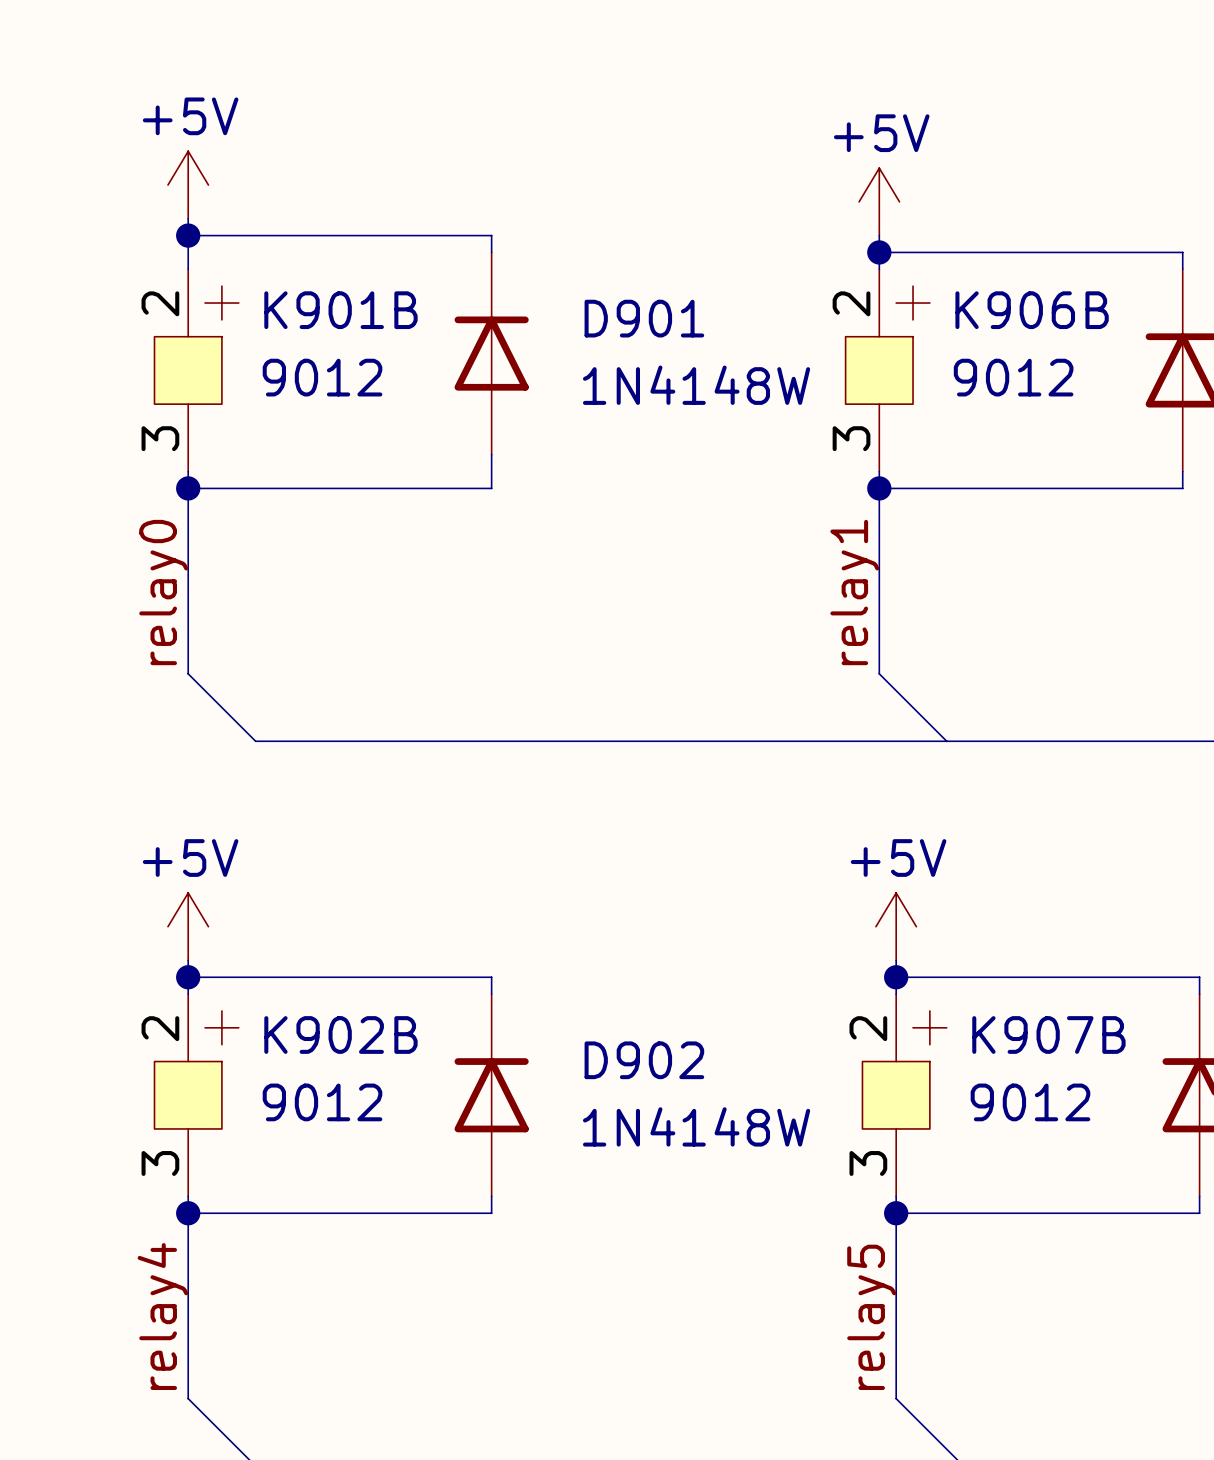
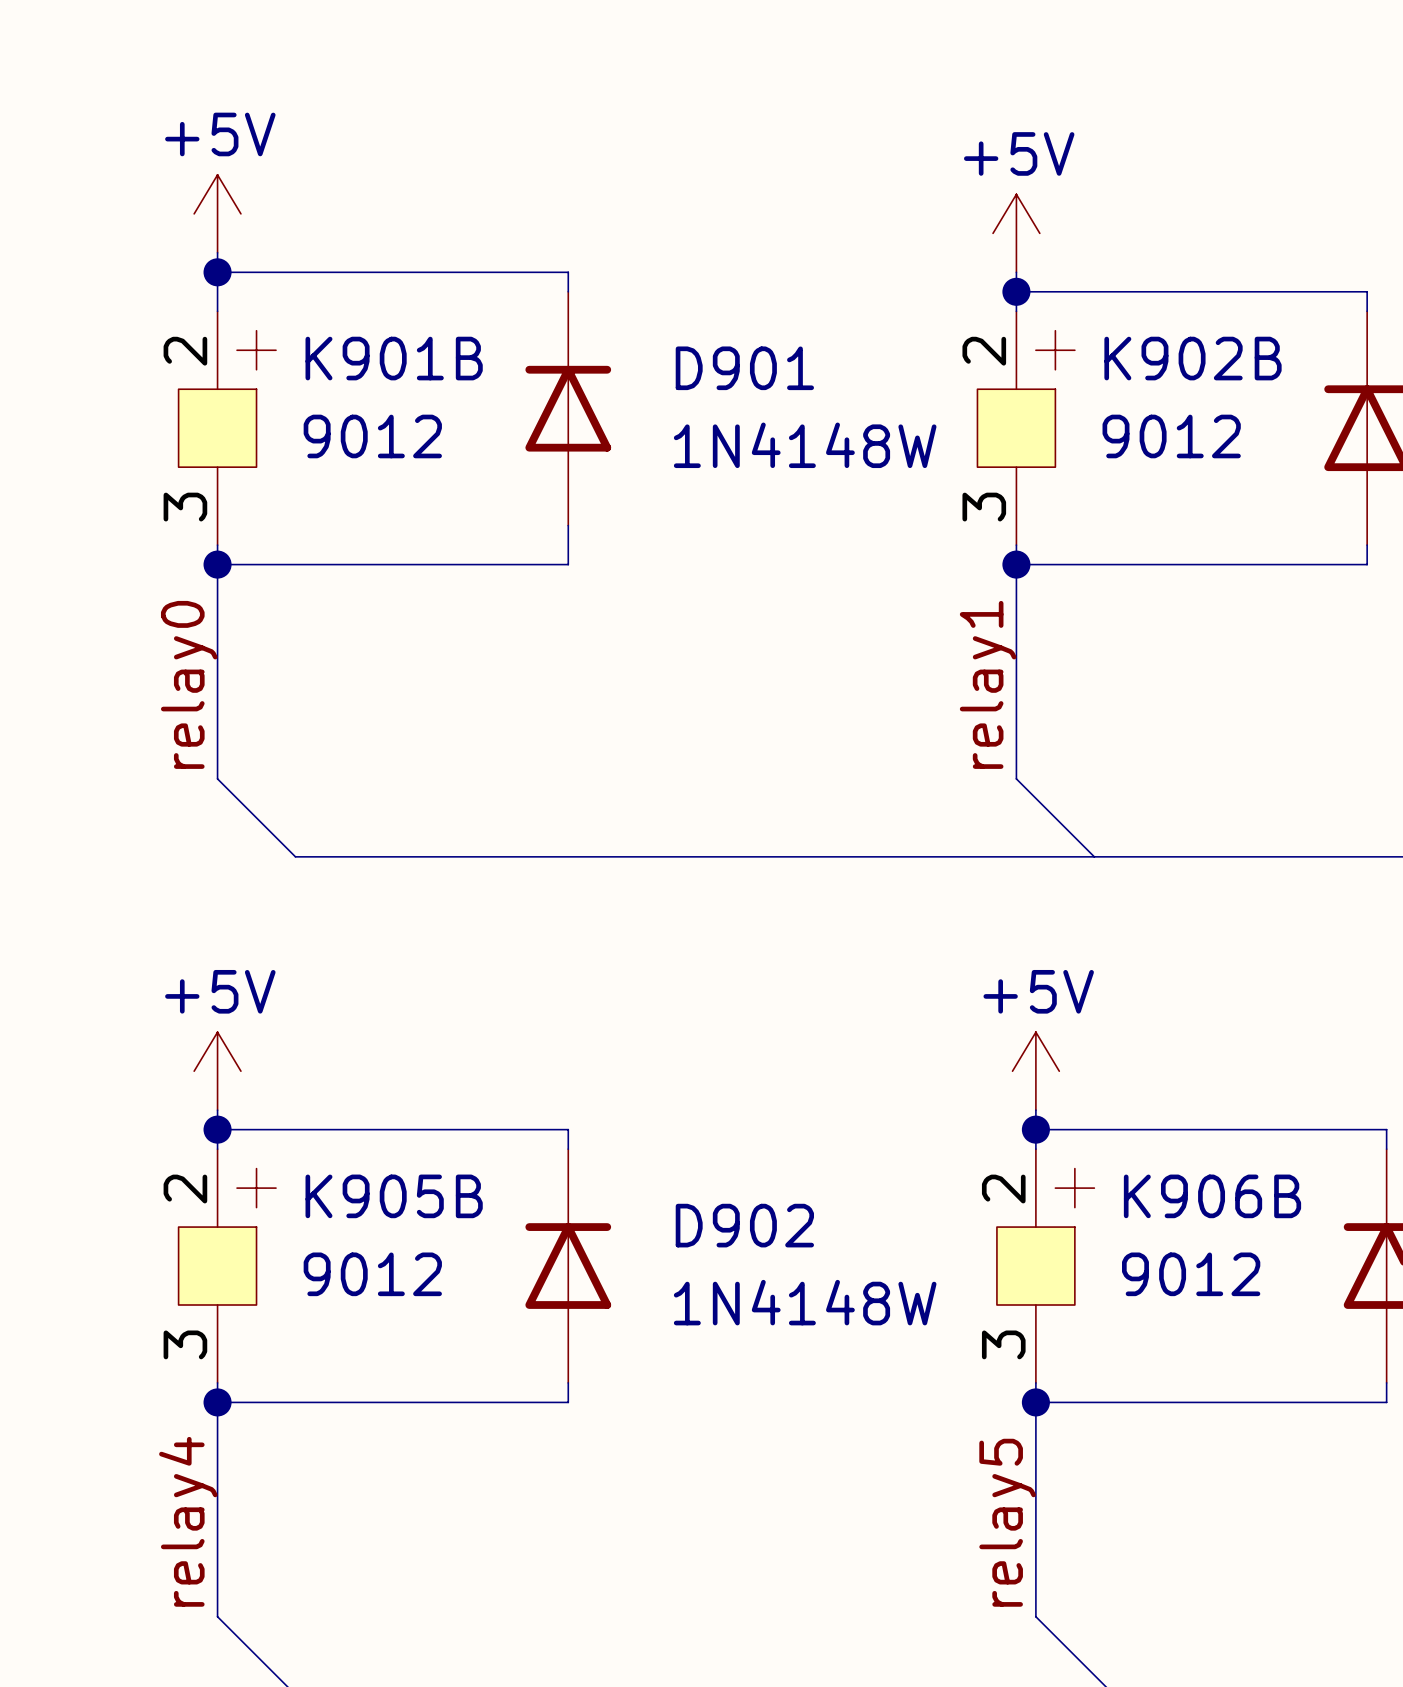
K906B name: K906B (1032, 310) -> K902B (1193, 358)
K902B name: K902B (340, 1035) -> K905B (394, 1196)
K907B name: K907B (1048, 1035) -> K906B (1212, 1196)

